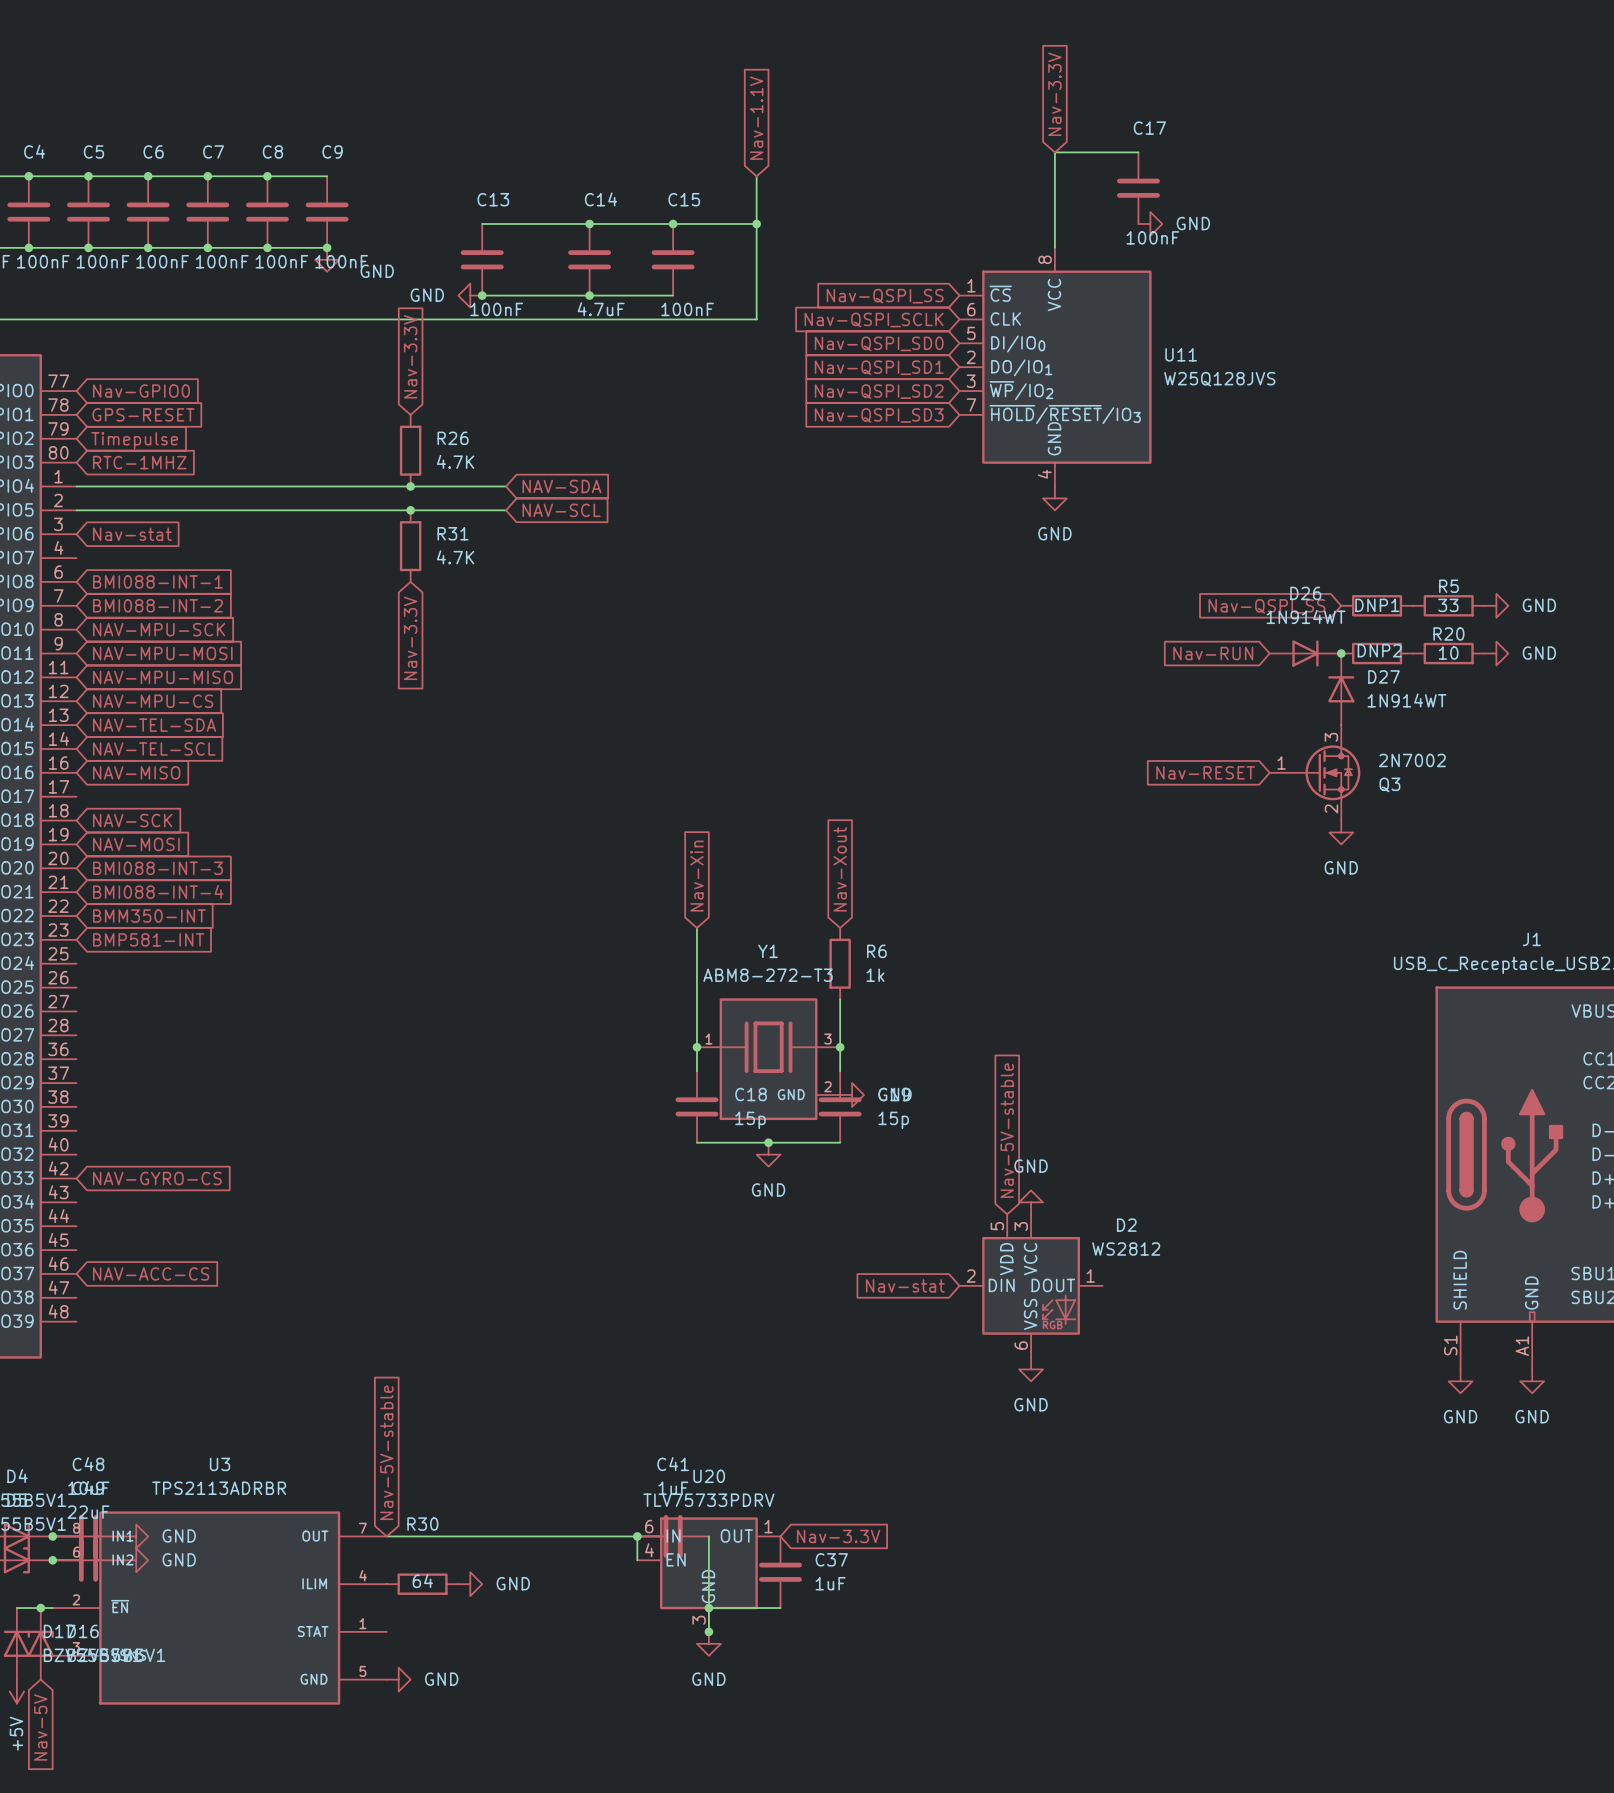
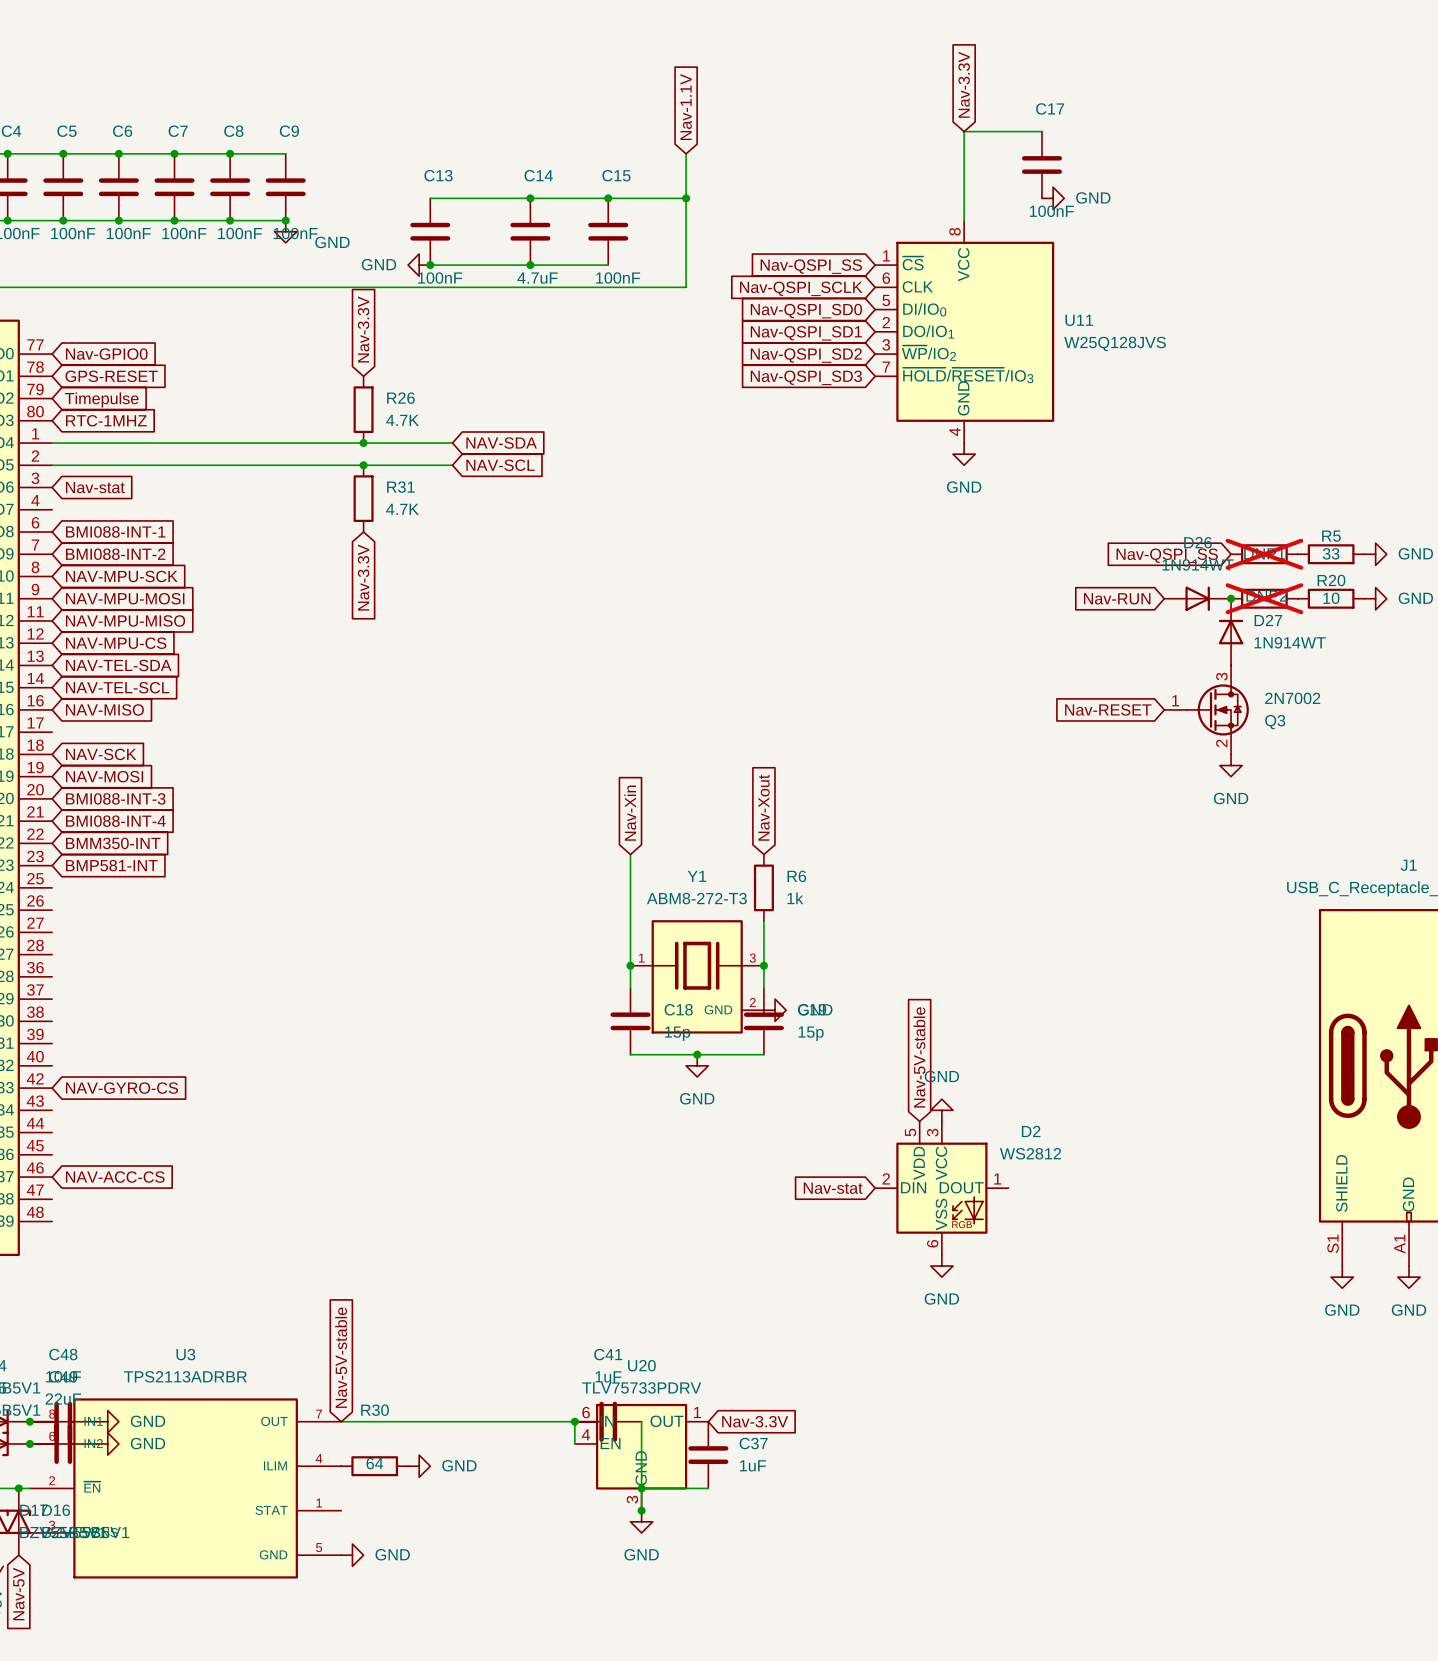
DNP1 do-not-place cross: none -> (1264, 554)
DNP2 do-not-place cross: none -> (1264, 598)

